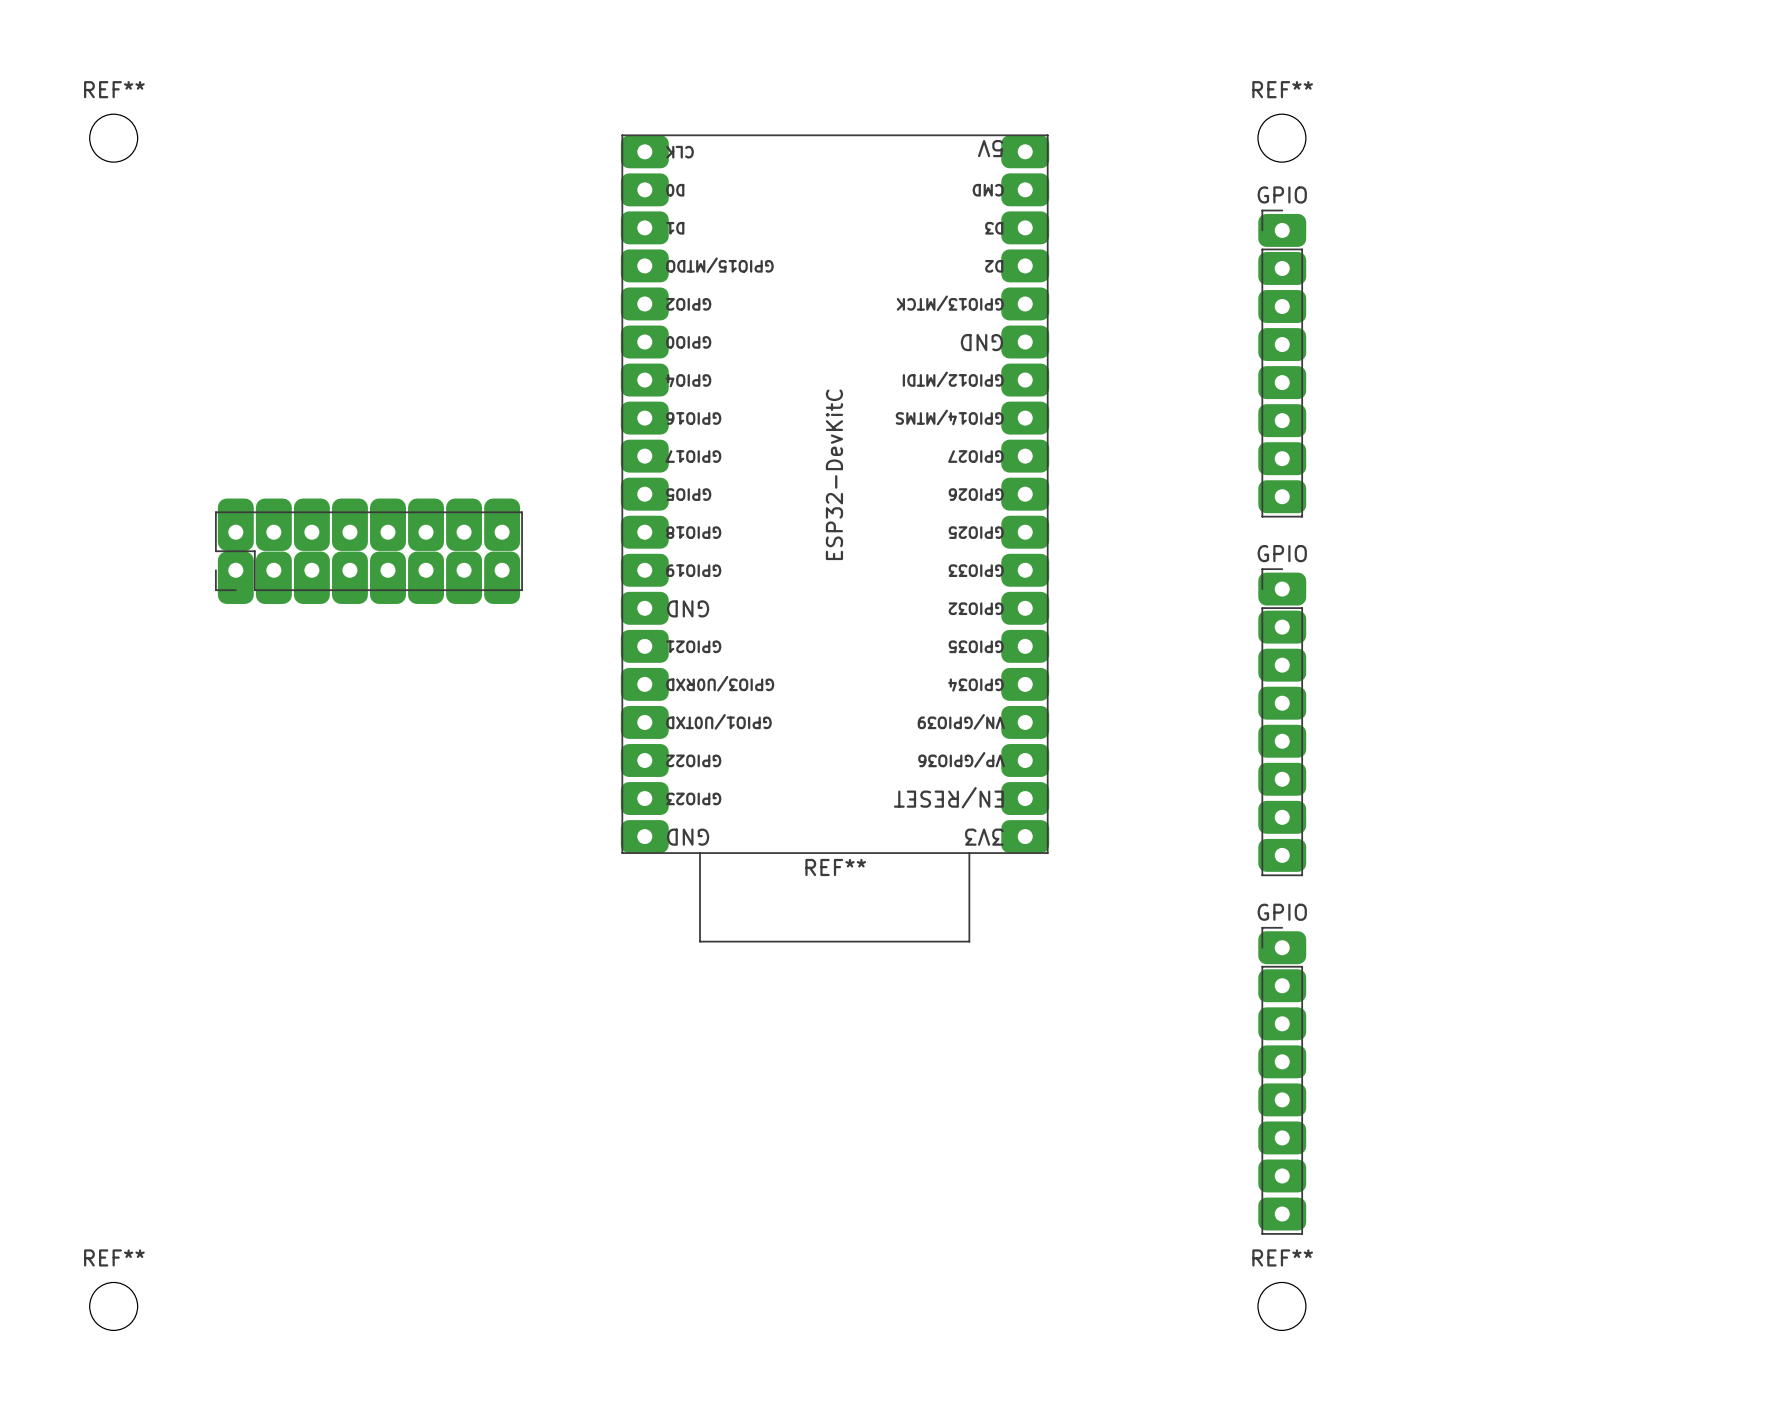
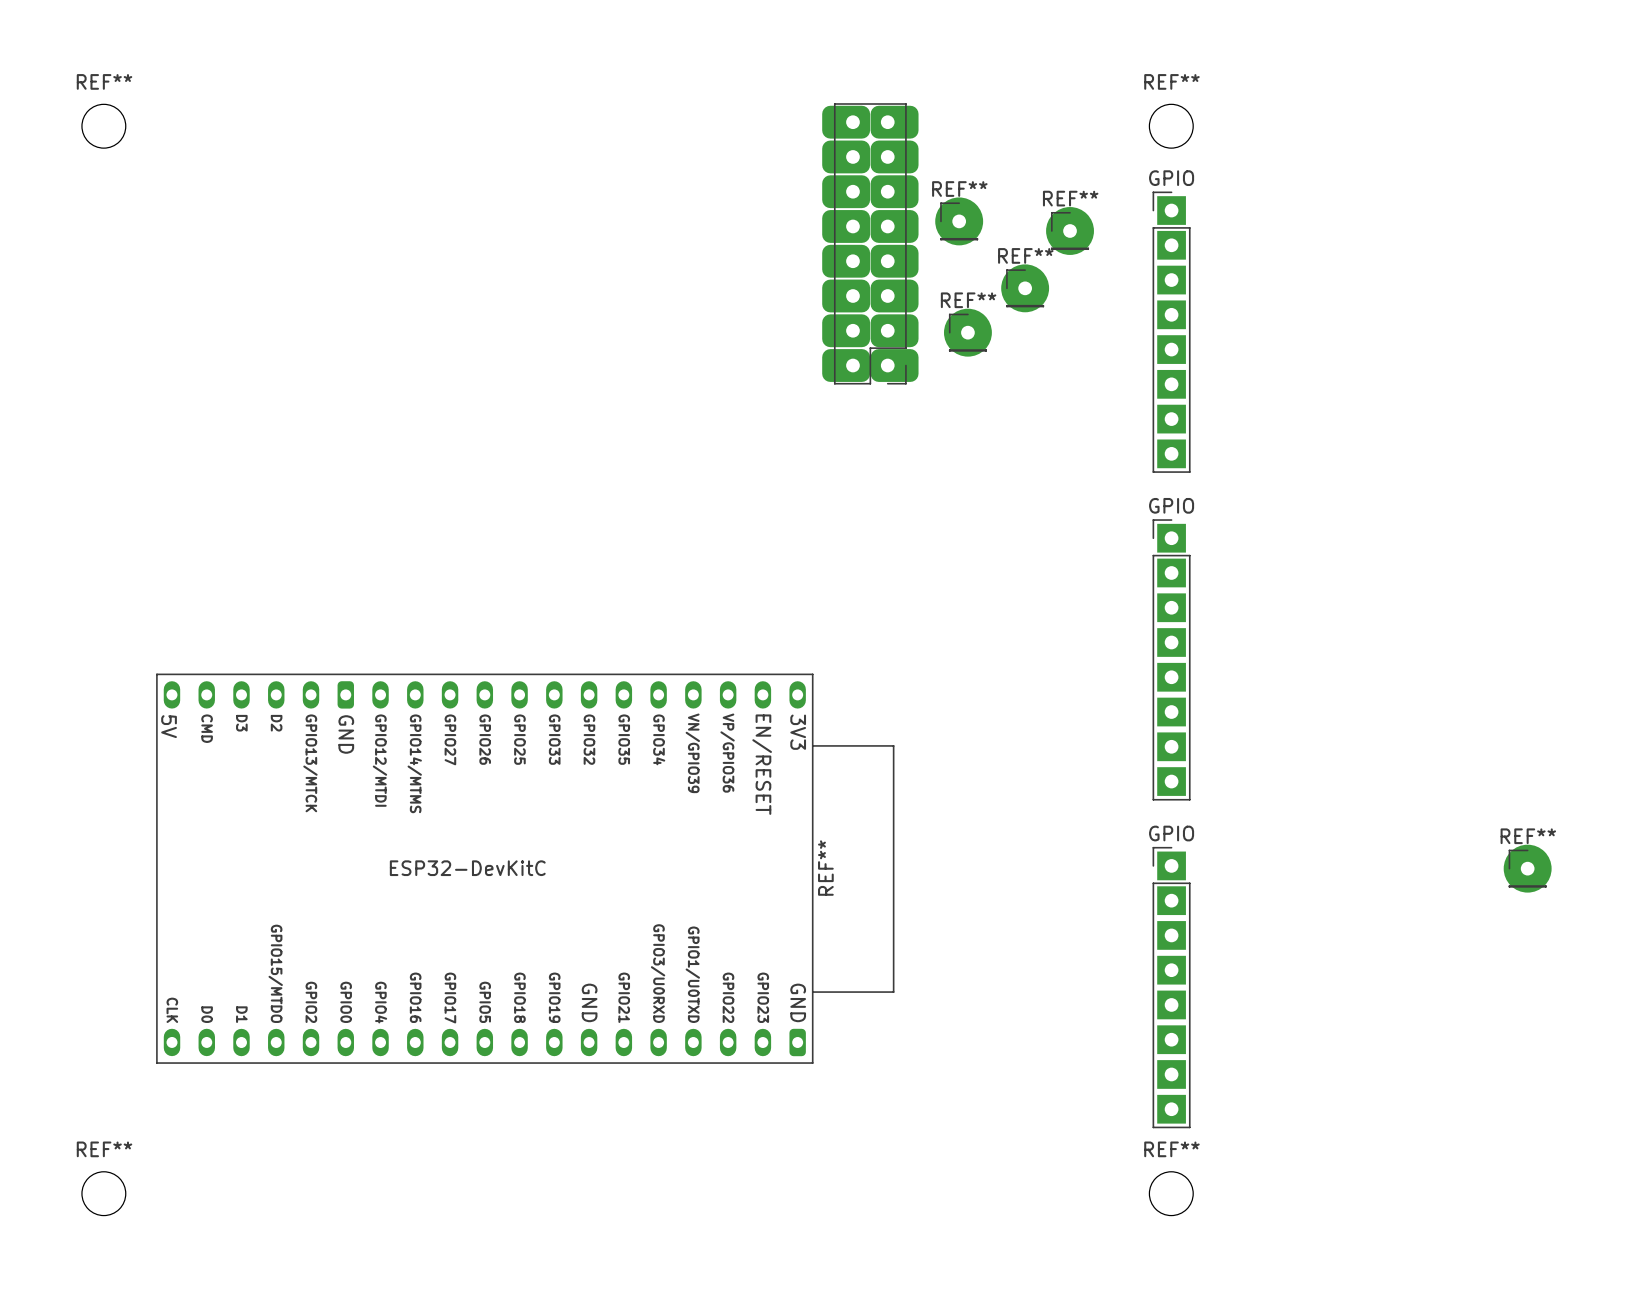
GPIO footprint: [1258, 209, 1307, 518] -> [1152, 191, 1191, 473]
REF**: none -> (959, 221)
REF**: none -> (1070, 230)
part: none -> (870, 243)
REF**: none -> (1025, 288)
REF**: none -> (967, 332)
REF**: ESP32-DevKitC (835, 538) -> none
part: (368, 551) -> none
GPIO footprint: [1258, 568, 1307, 877] -> [1152, 519, 1191, 801]
GPIO footprint: [1258, 926, 1307, 1235] -> [1152, 846, 1191, 1129]
REF**: none -> ESP32-DevKitC (525, 868)
REF**: none -> (1527, 868)

